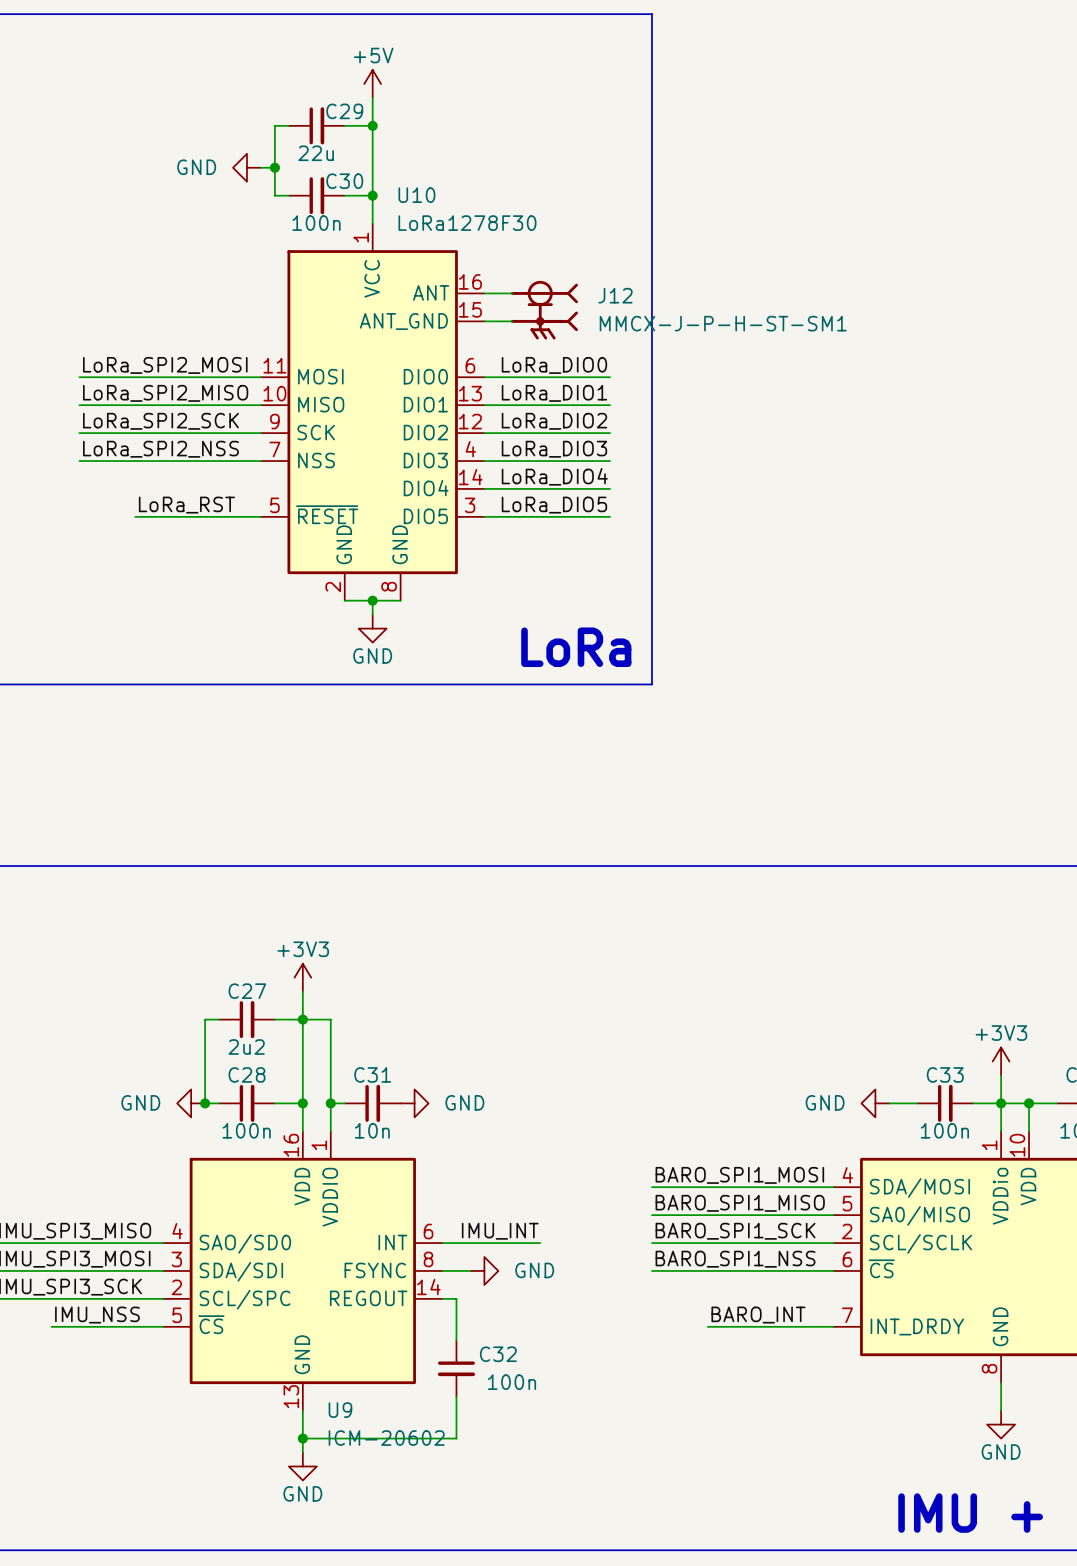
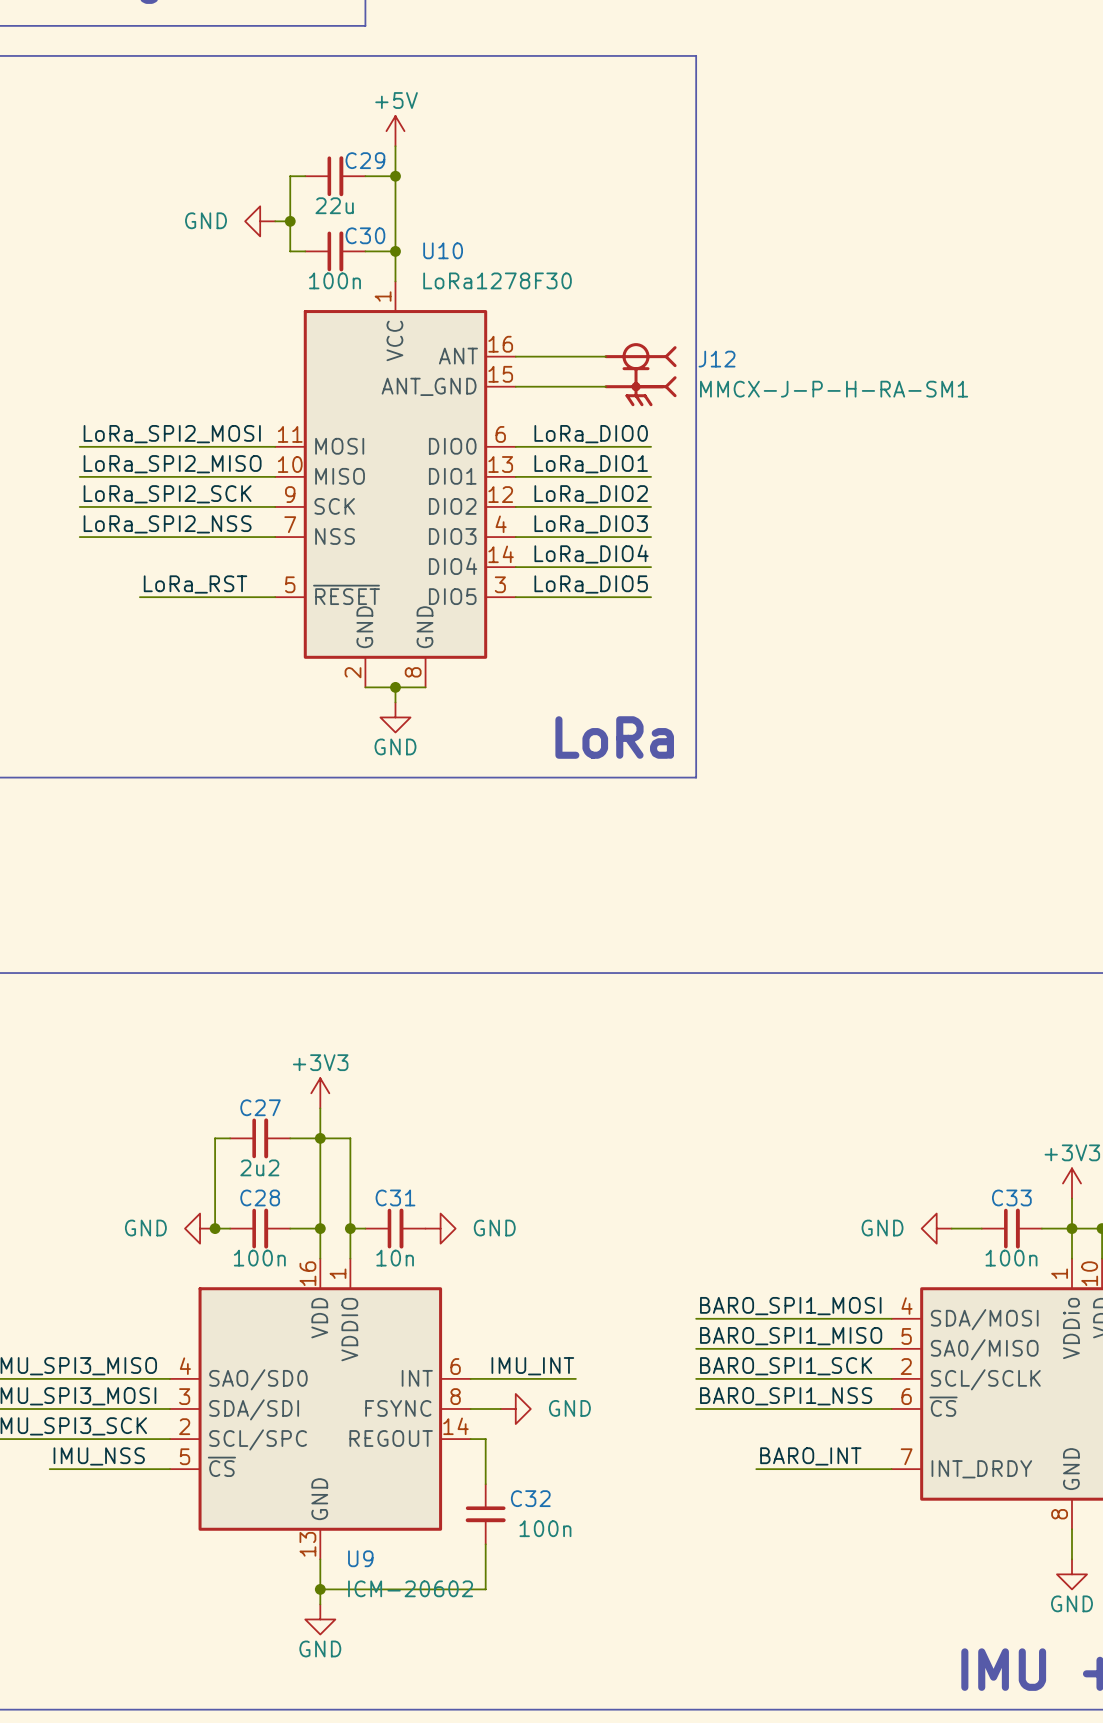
J12 position: (544, 310) -> (640, 374)
J12 value: MMCX-J-P-H-ST-SM1 (723, 323) -> MMCX-J-P-H-RA-SM1 (834, 389)

